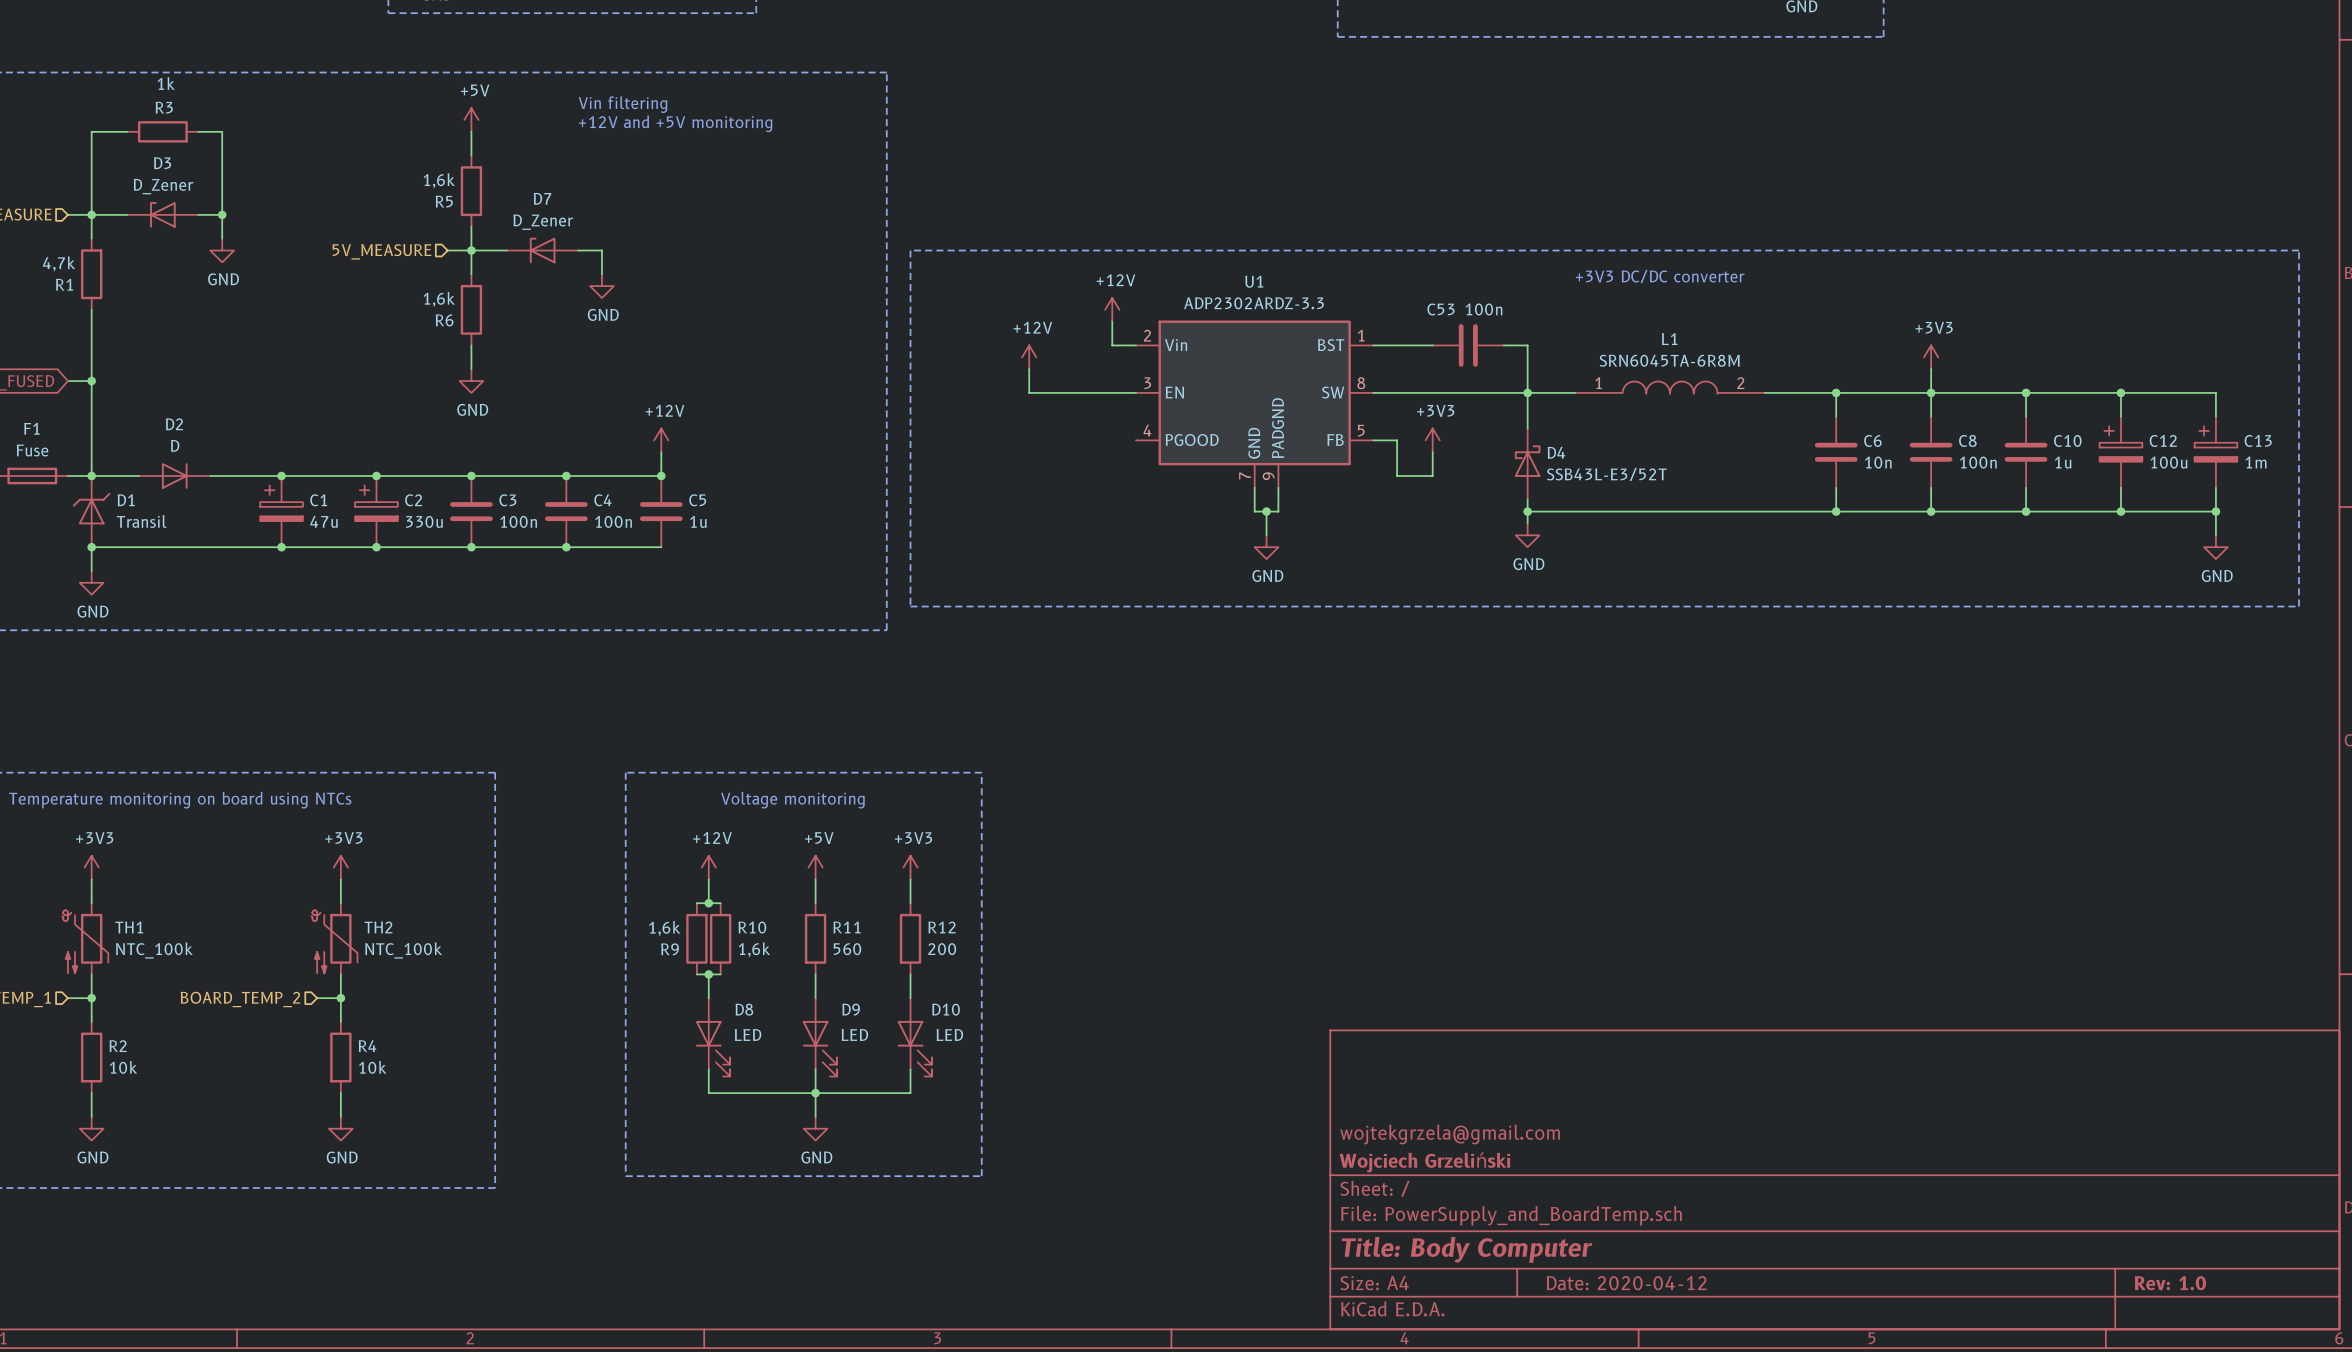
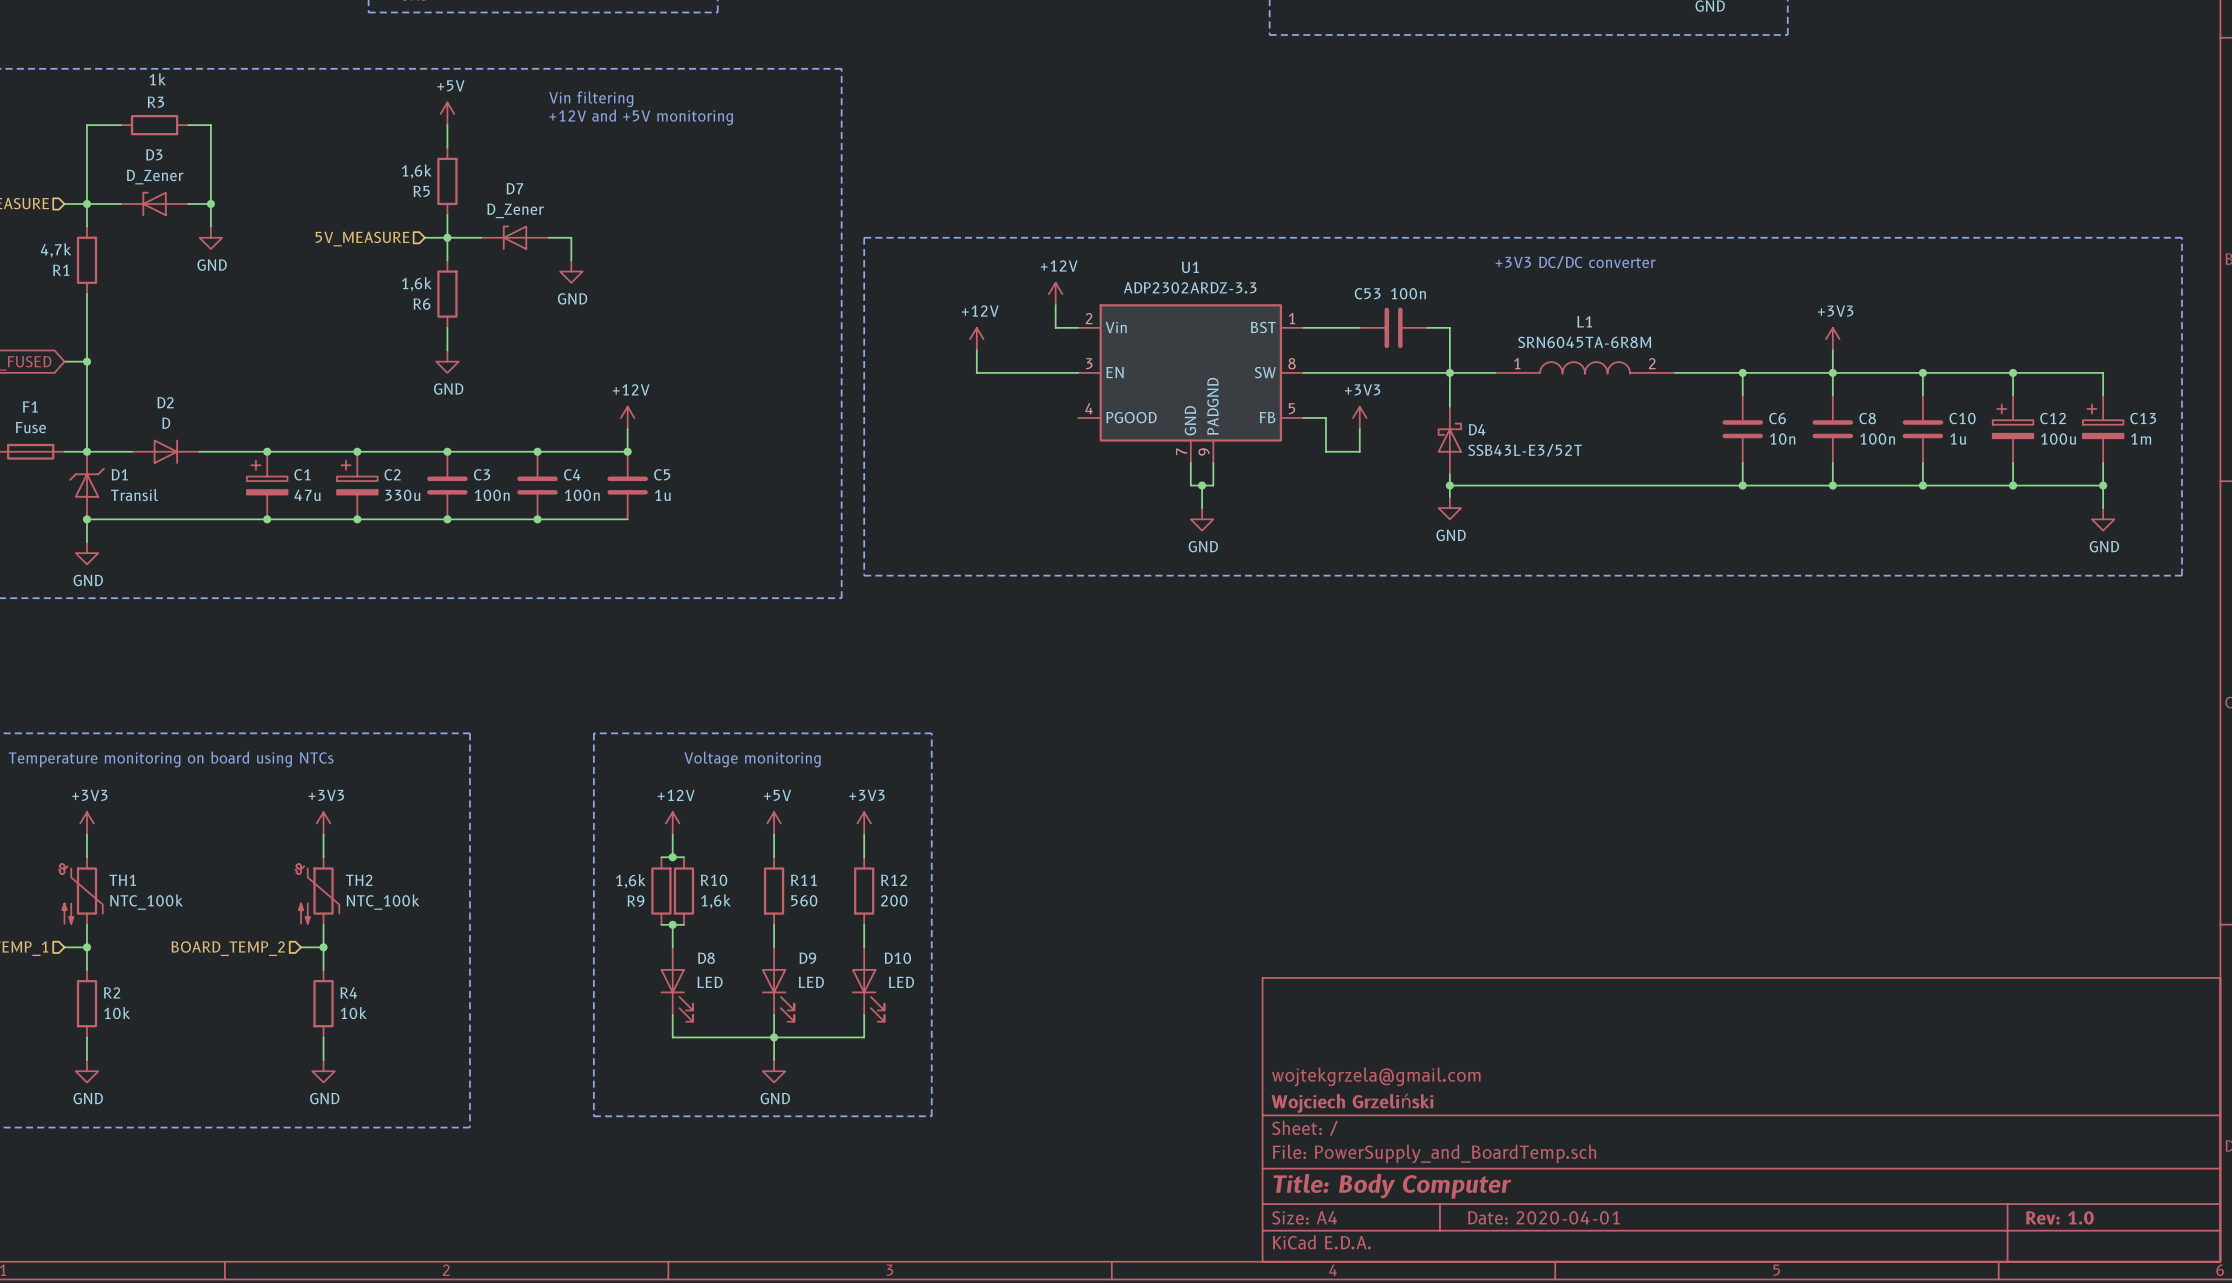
title block: Date: 2020-04-12 (1626, 1283) -> Date: 2020-04-01 (1543, 1217)

